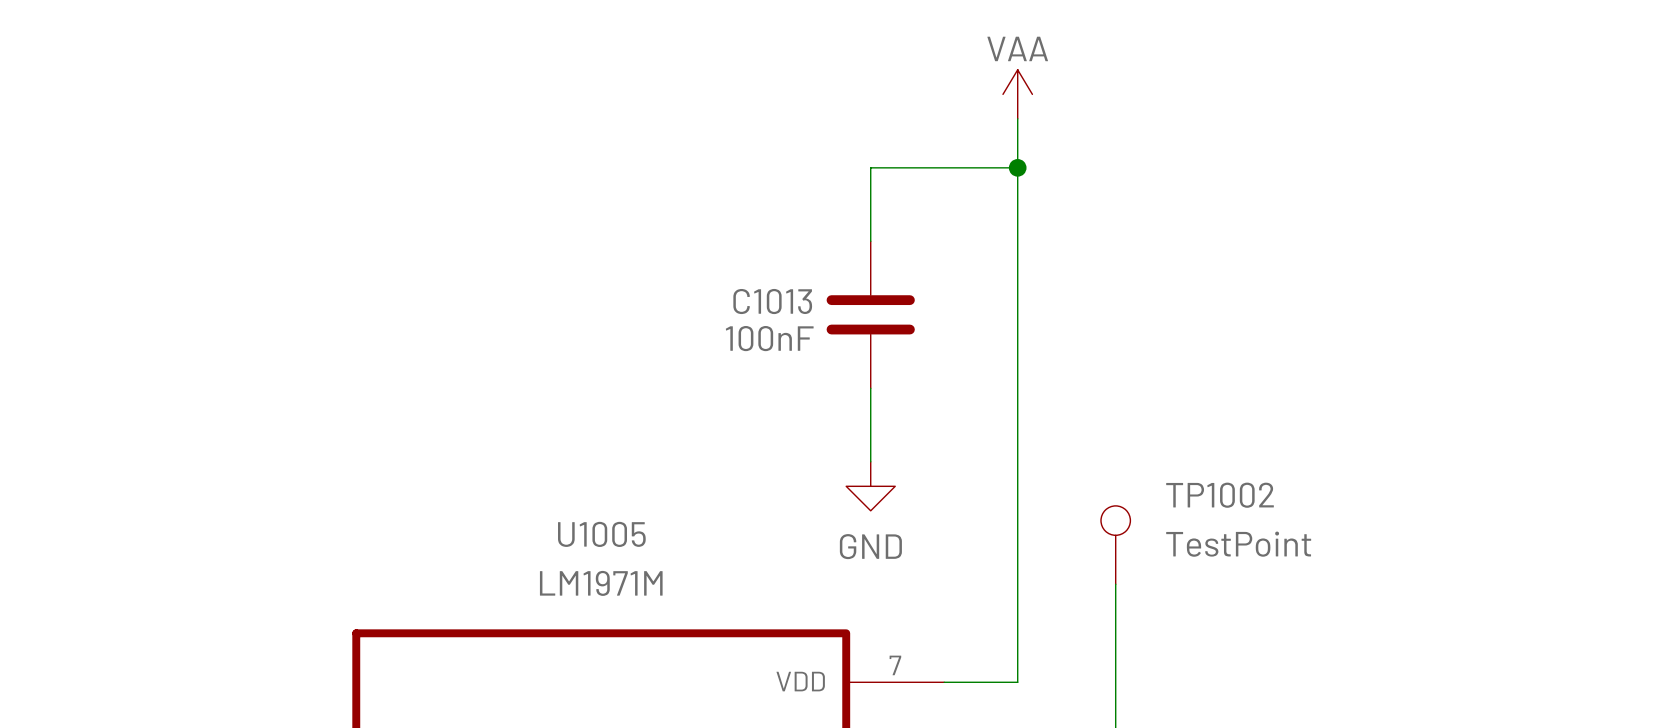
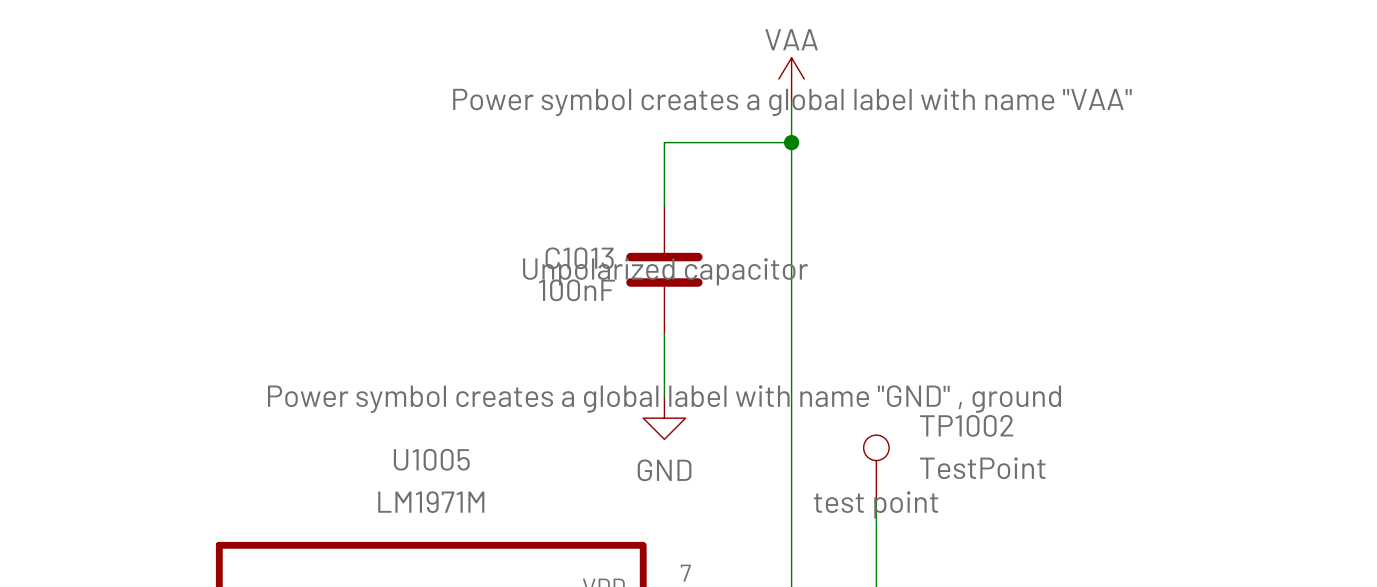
power symbol text: none -> Power symbol creates a global label with name "VAA" (792, 102)
C1013 text: none -> Unpolarized capacitor (665, 271)
power symbol text: none -> Power symbol creates a global label with name "GND" , ground (664, 399)
TP1002 text: none -> test point (876, 504)

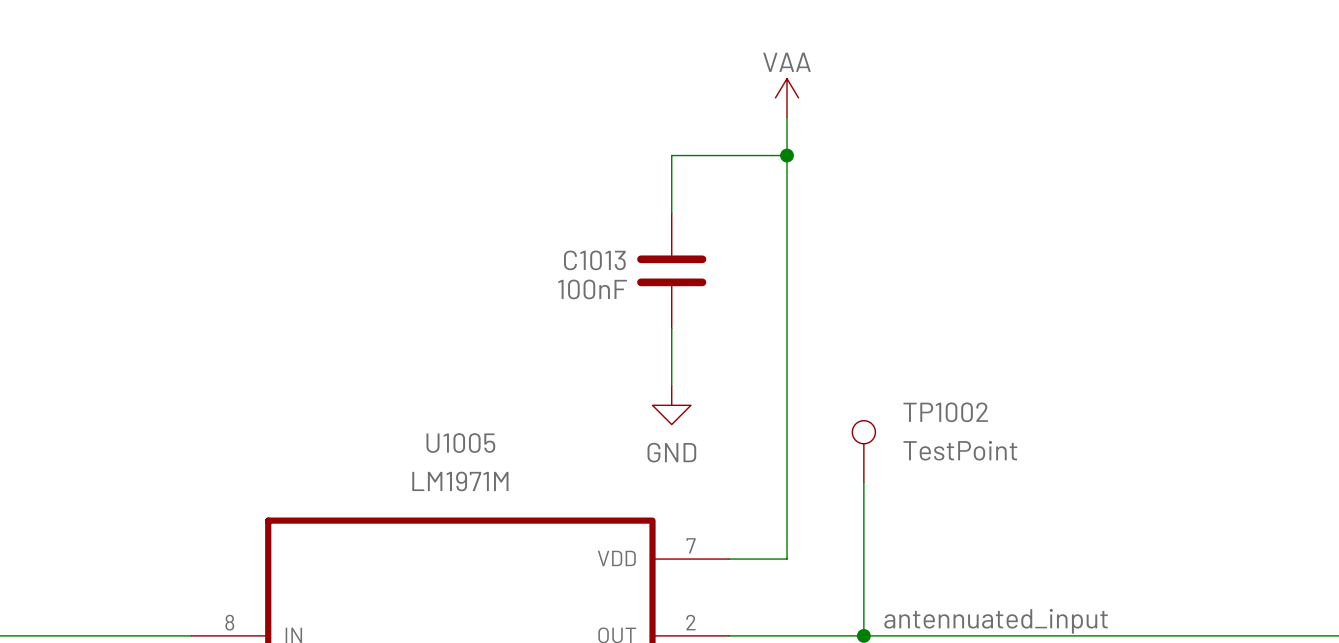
power symbol text: Power symbol creates a global label with name "VAA" (792, 102) -> none
C1013 text: Unpolarized capacitor (665, 271) -> none
power symbol text: Power symbol creates a global label with name "GND" , ground (664, 399) -> none
TP1002 text: test point (876, 504) -> none

